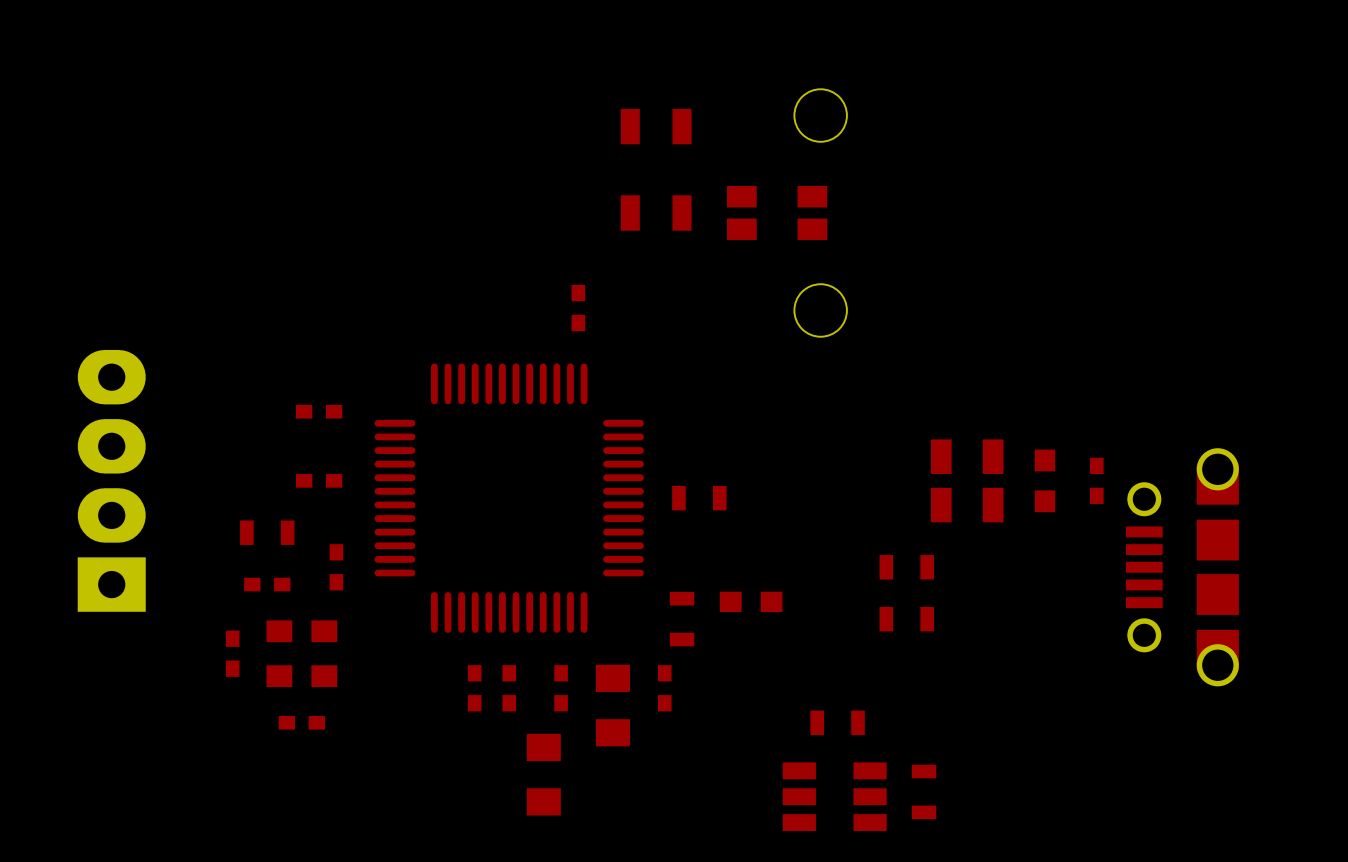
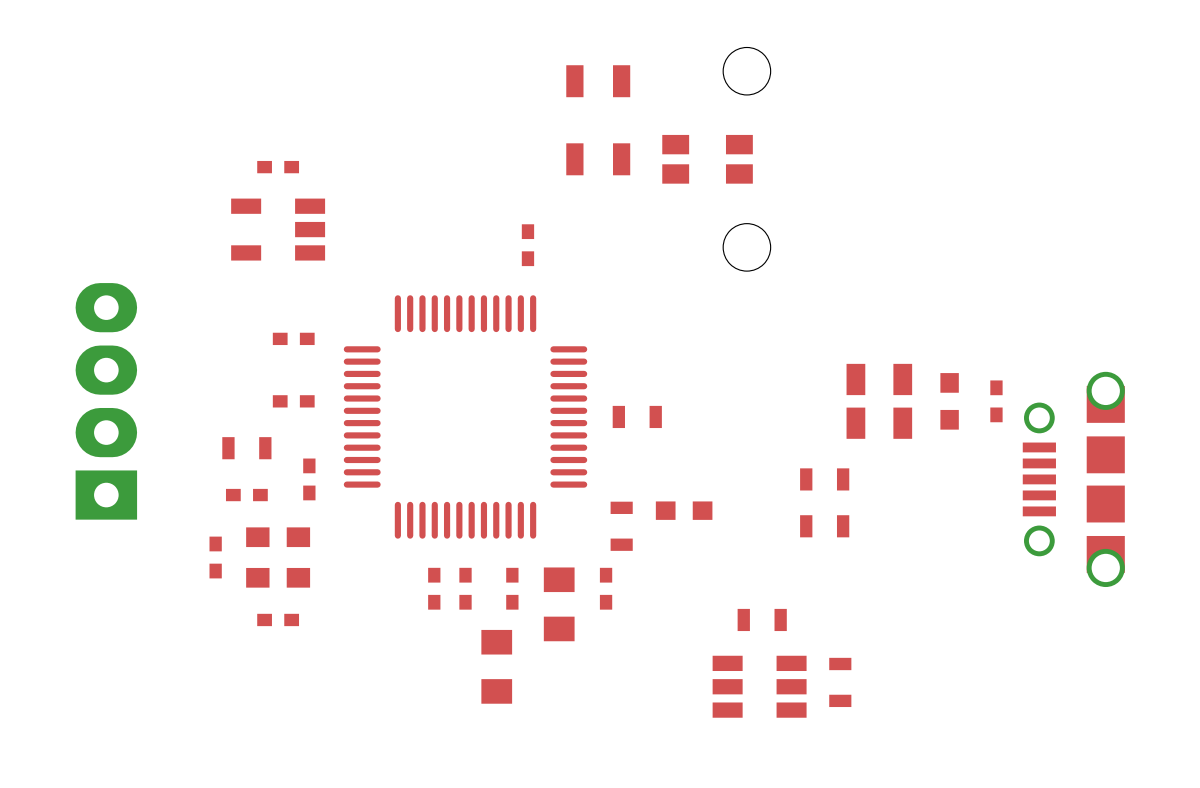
part: none -> (278, 167)
part: none -> (278, 229)

